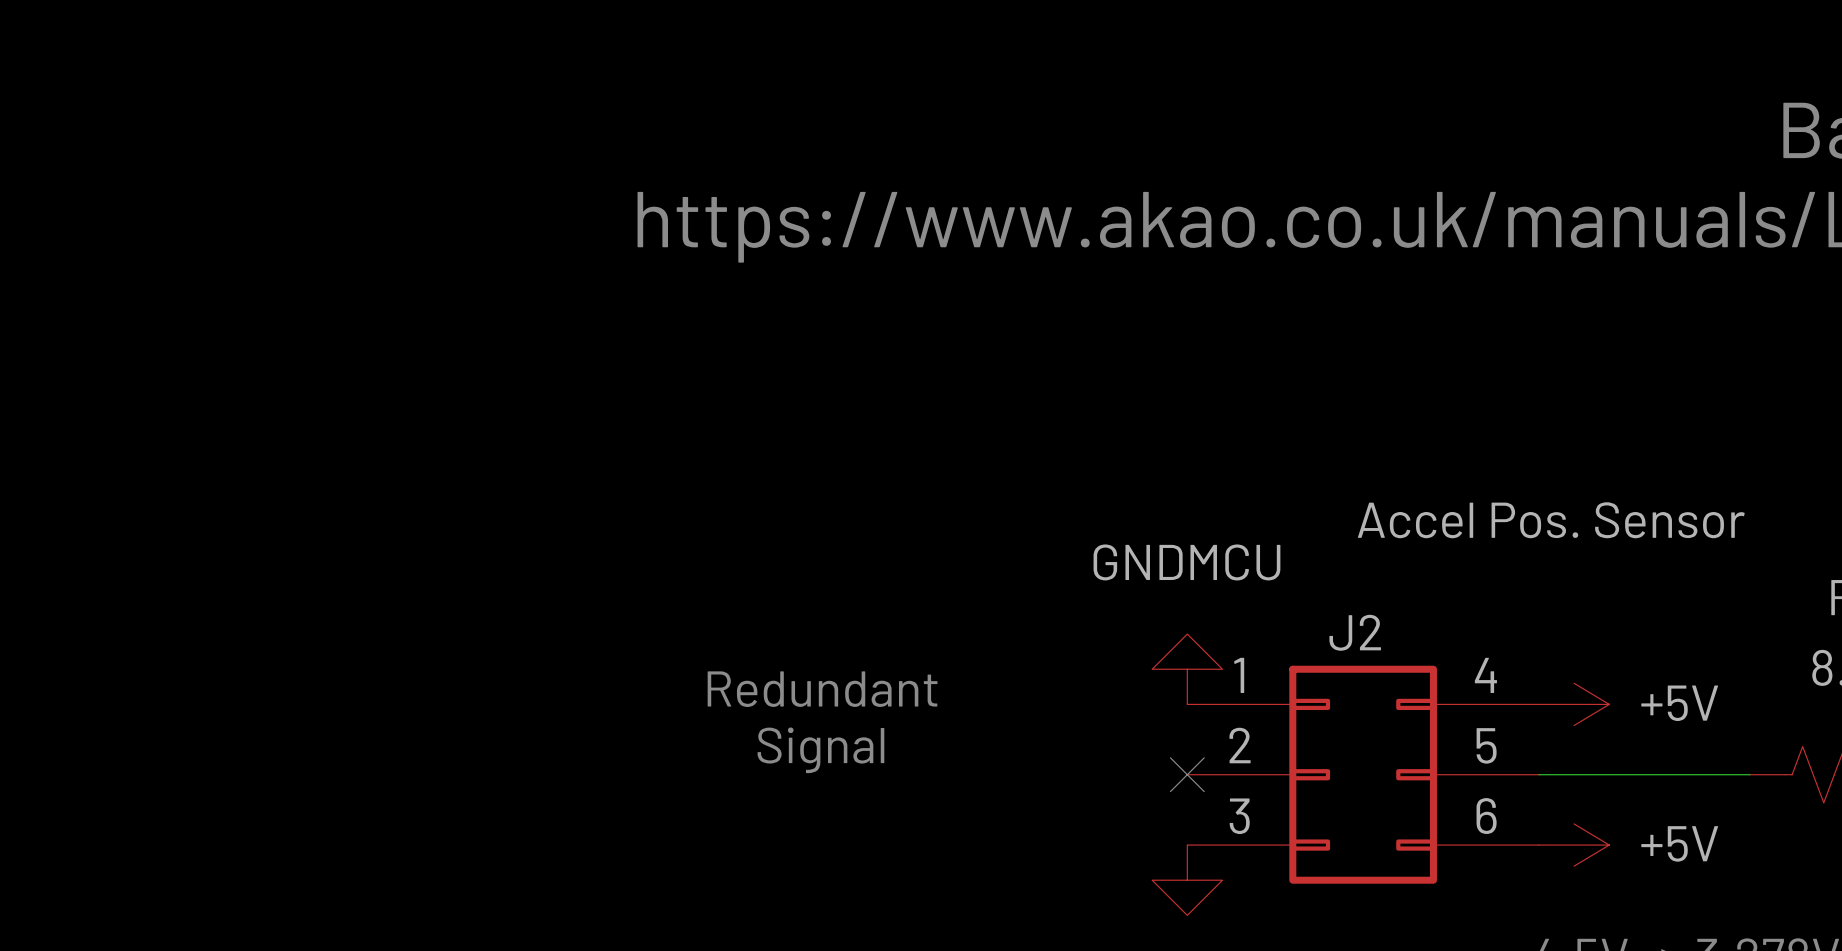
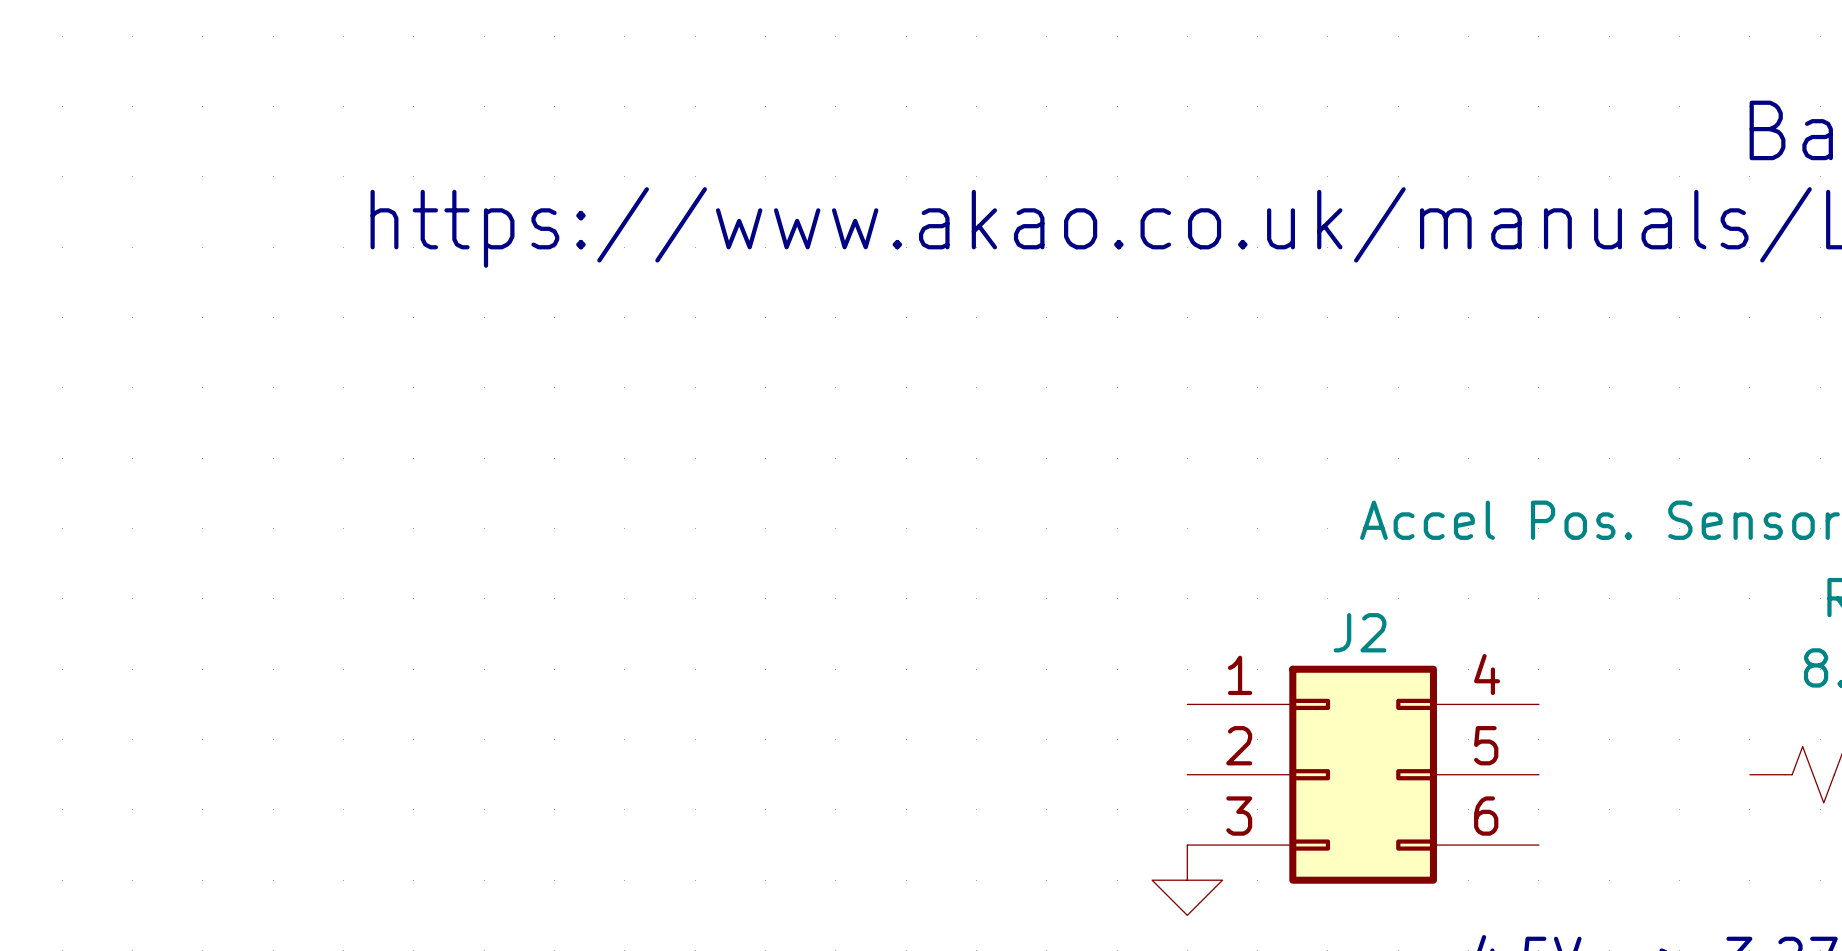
power symbol: GNDMCU (1187, 669) -> none
text: Redundant (822, 689) -> none
power symbol: +5V (1574, 704) -> none
text: Signal (820, 750) -> none
no-connect mark: (1187, 774) -> none
wire: (1538, 774) (1749, 774) -> none
power symbol: +5V (1574, 845) -> none

